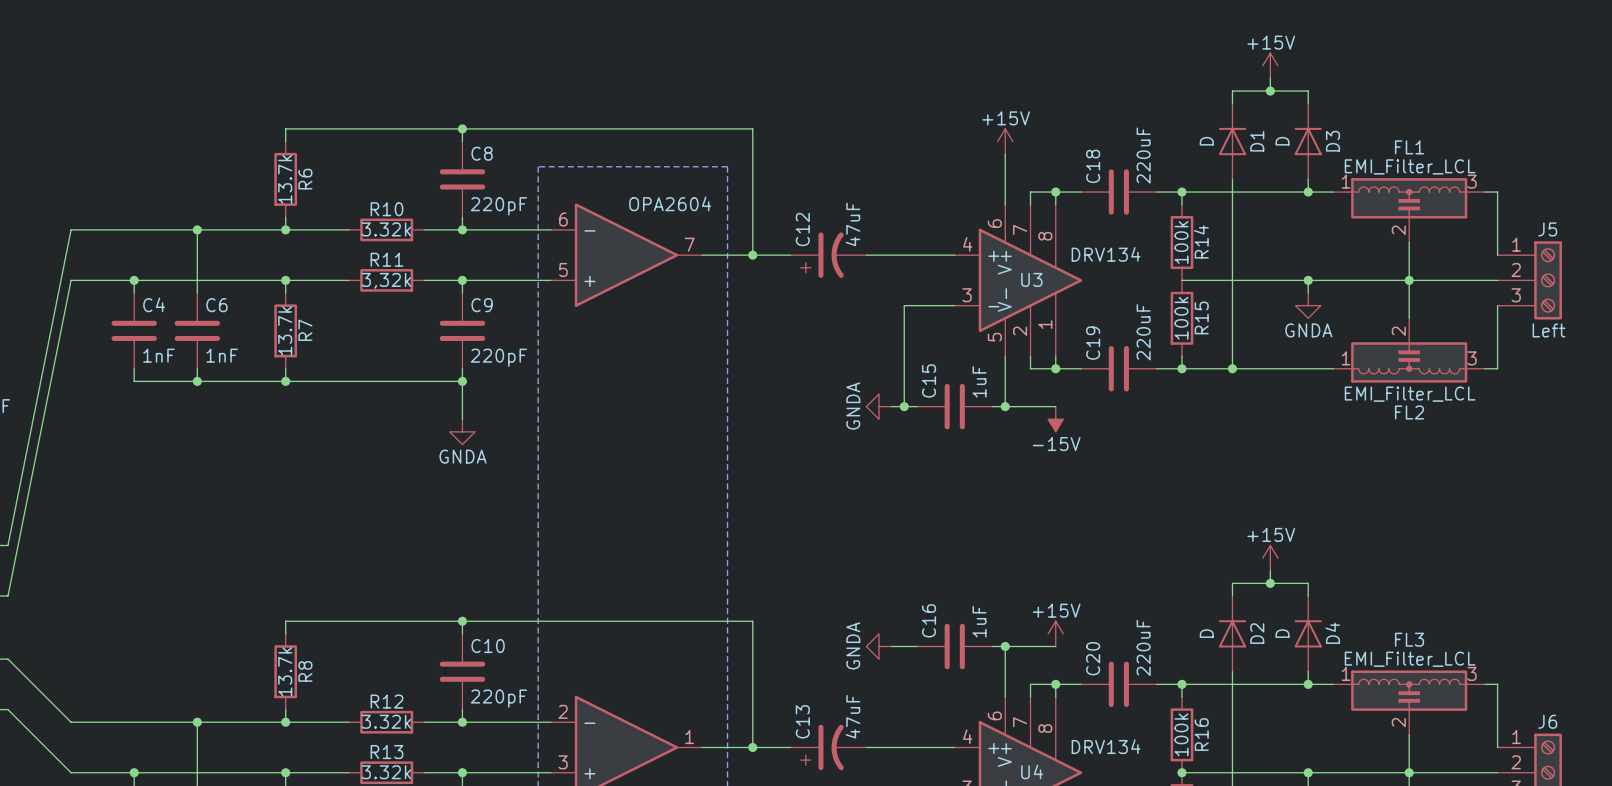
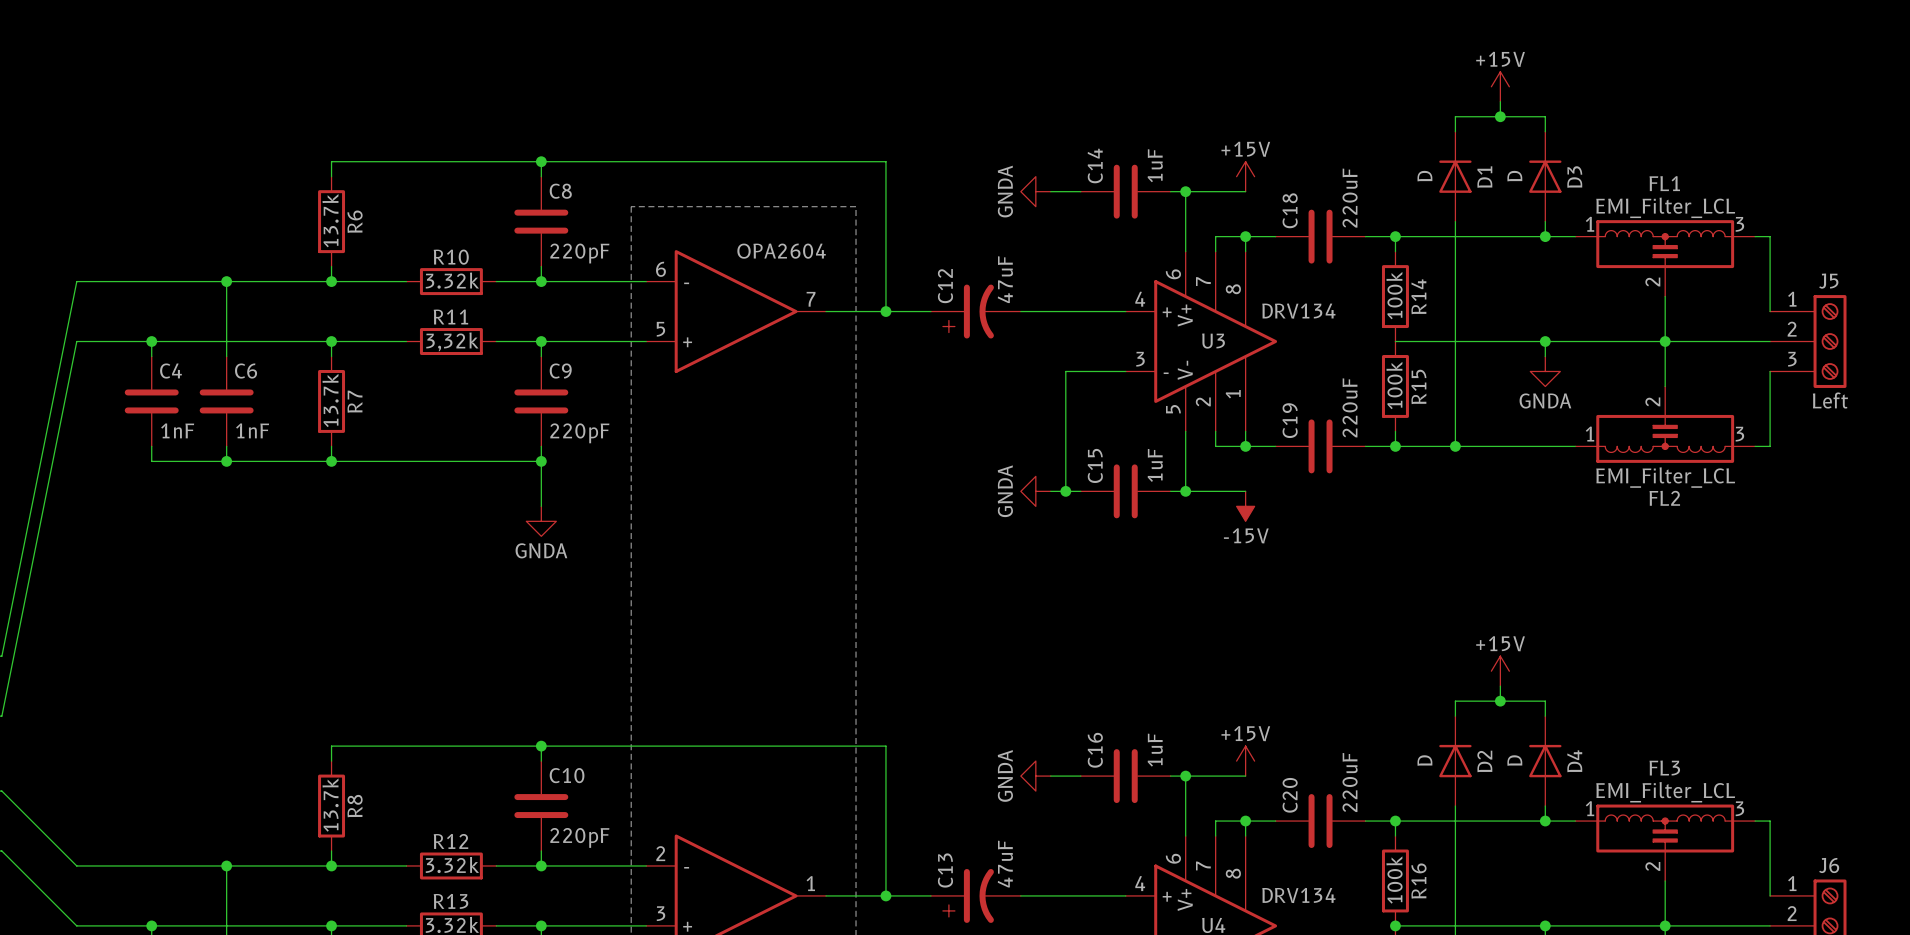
power symbol position: +15V (1005, 141) -> +15V (1245, 176)
power symbol: none -> GNDA (1035, 191)
wire: none -> (1050, 191) (1080, 191)
C14: none -> 1uF (1125, 191)
wire: none -> (1170, 191) (1245, 191)
junction: none -> (1185, 191)

